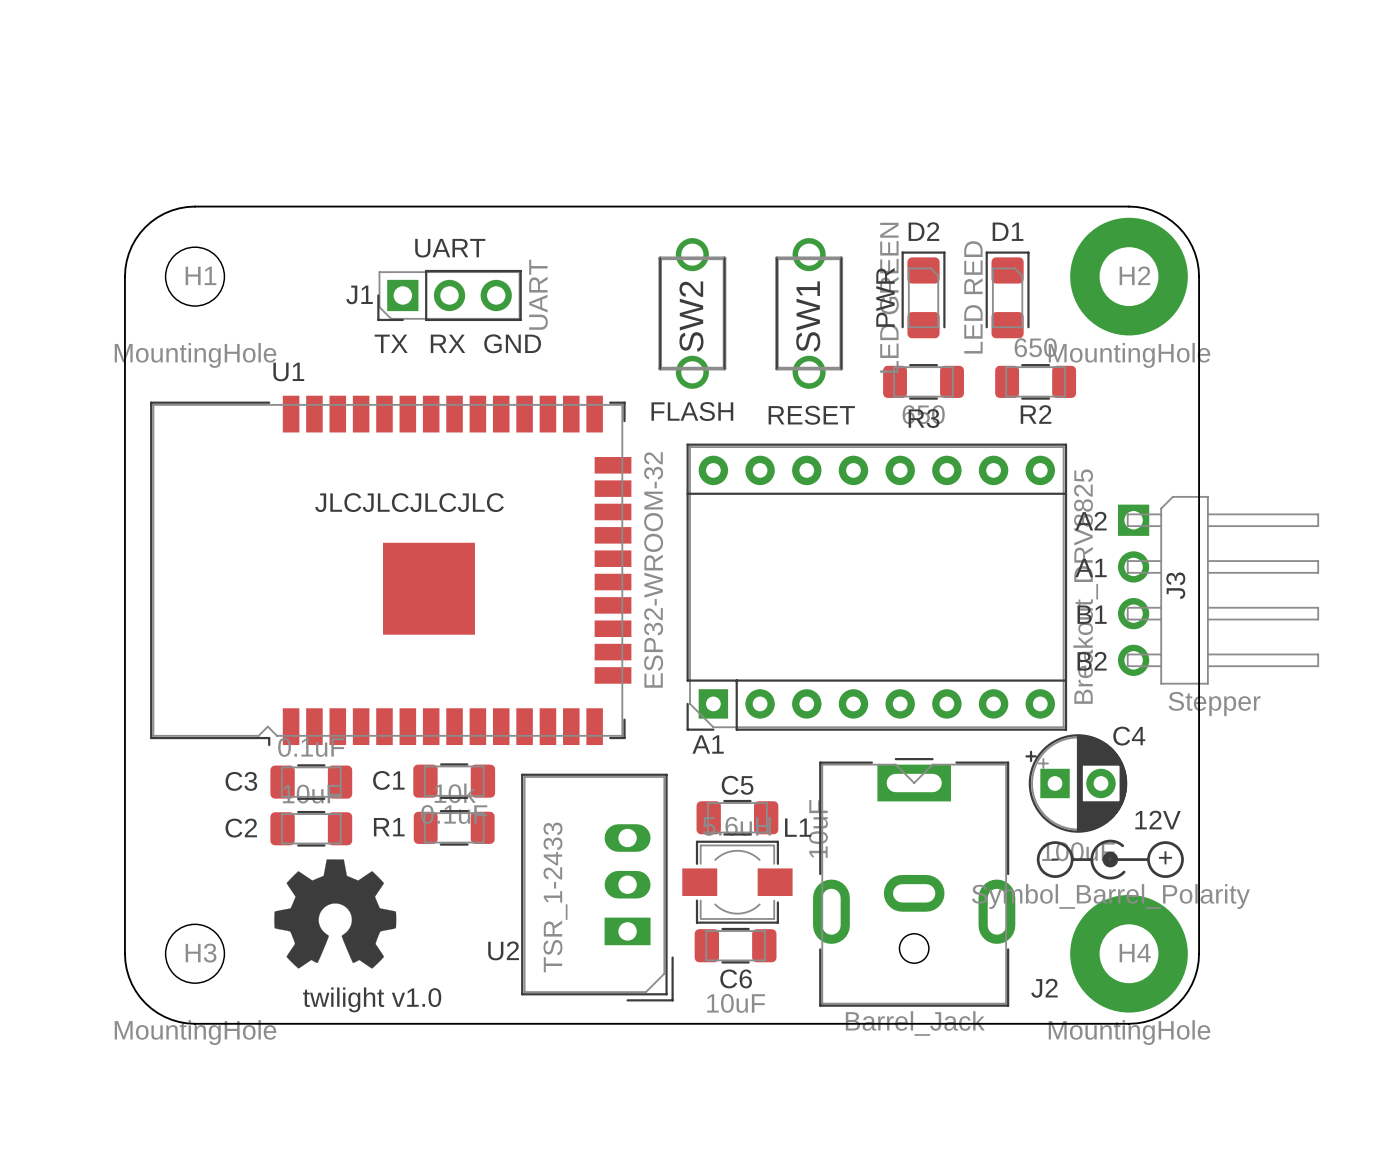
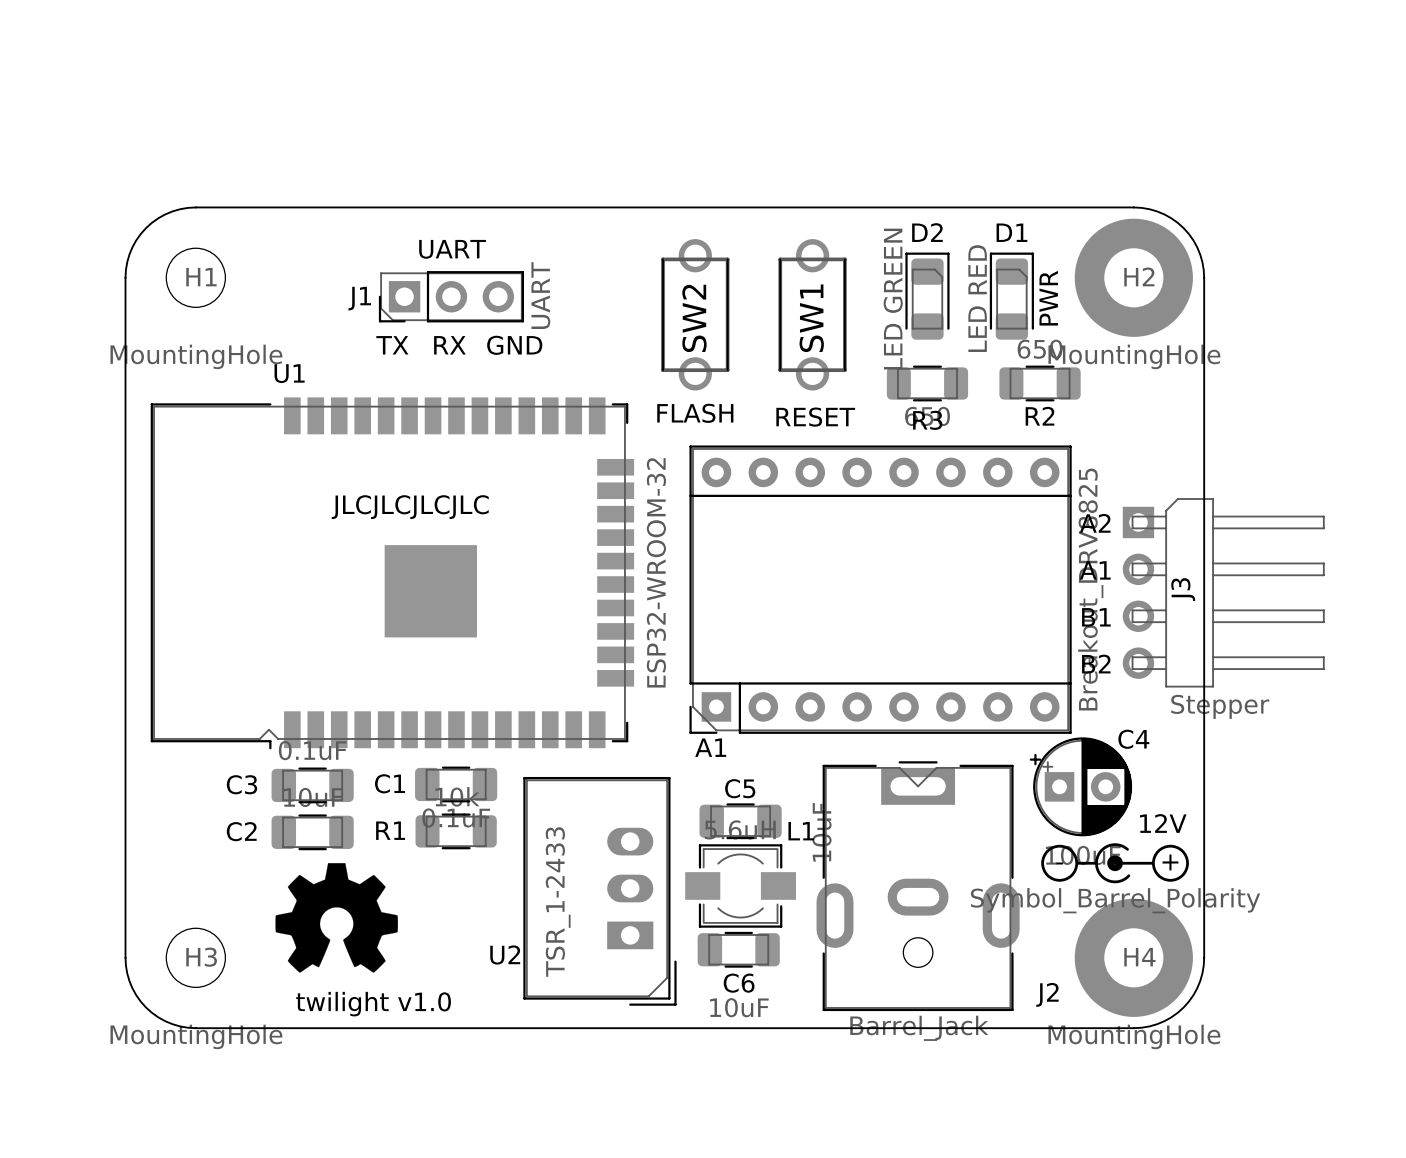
text position: PWR (885, 297) -> PWR (1048, 298)

